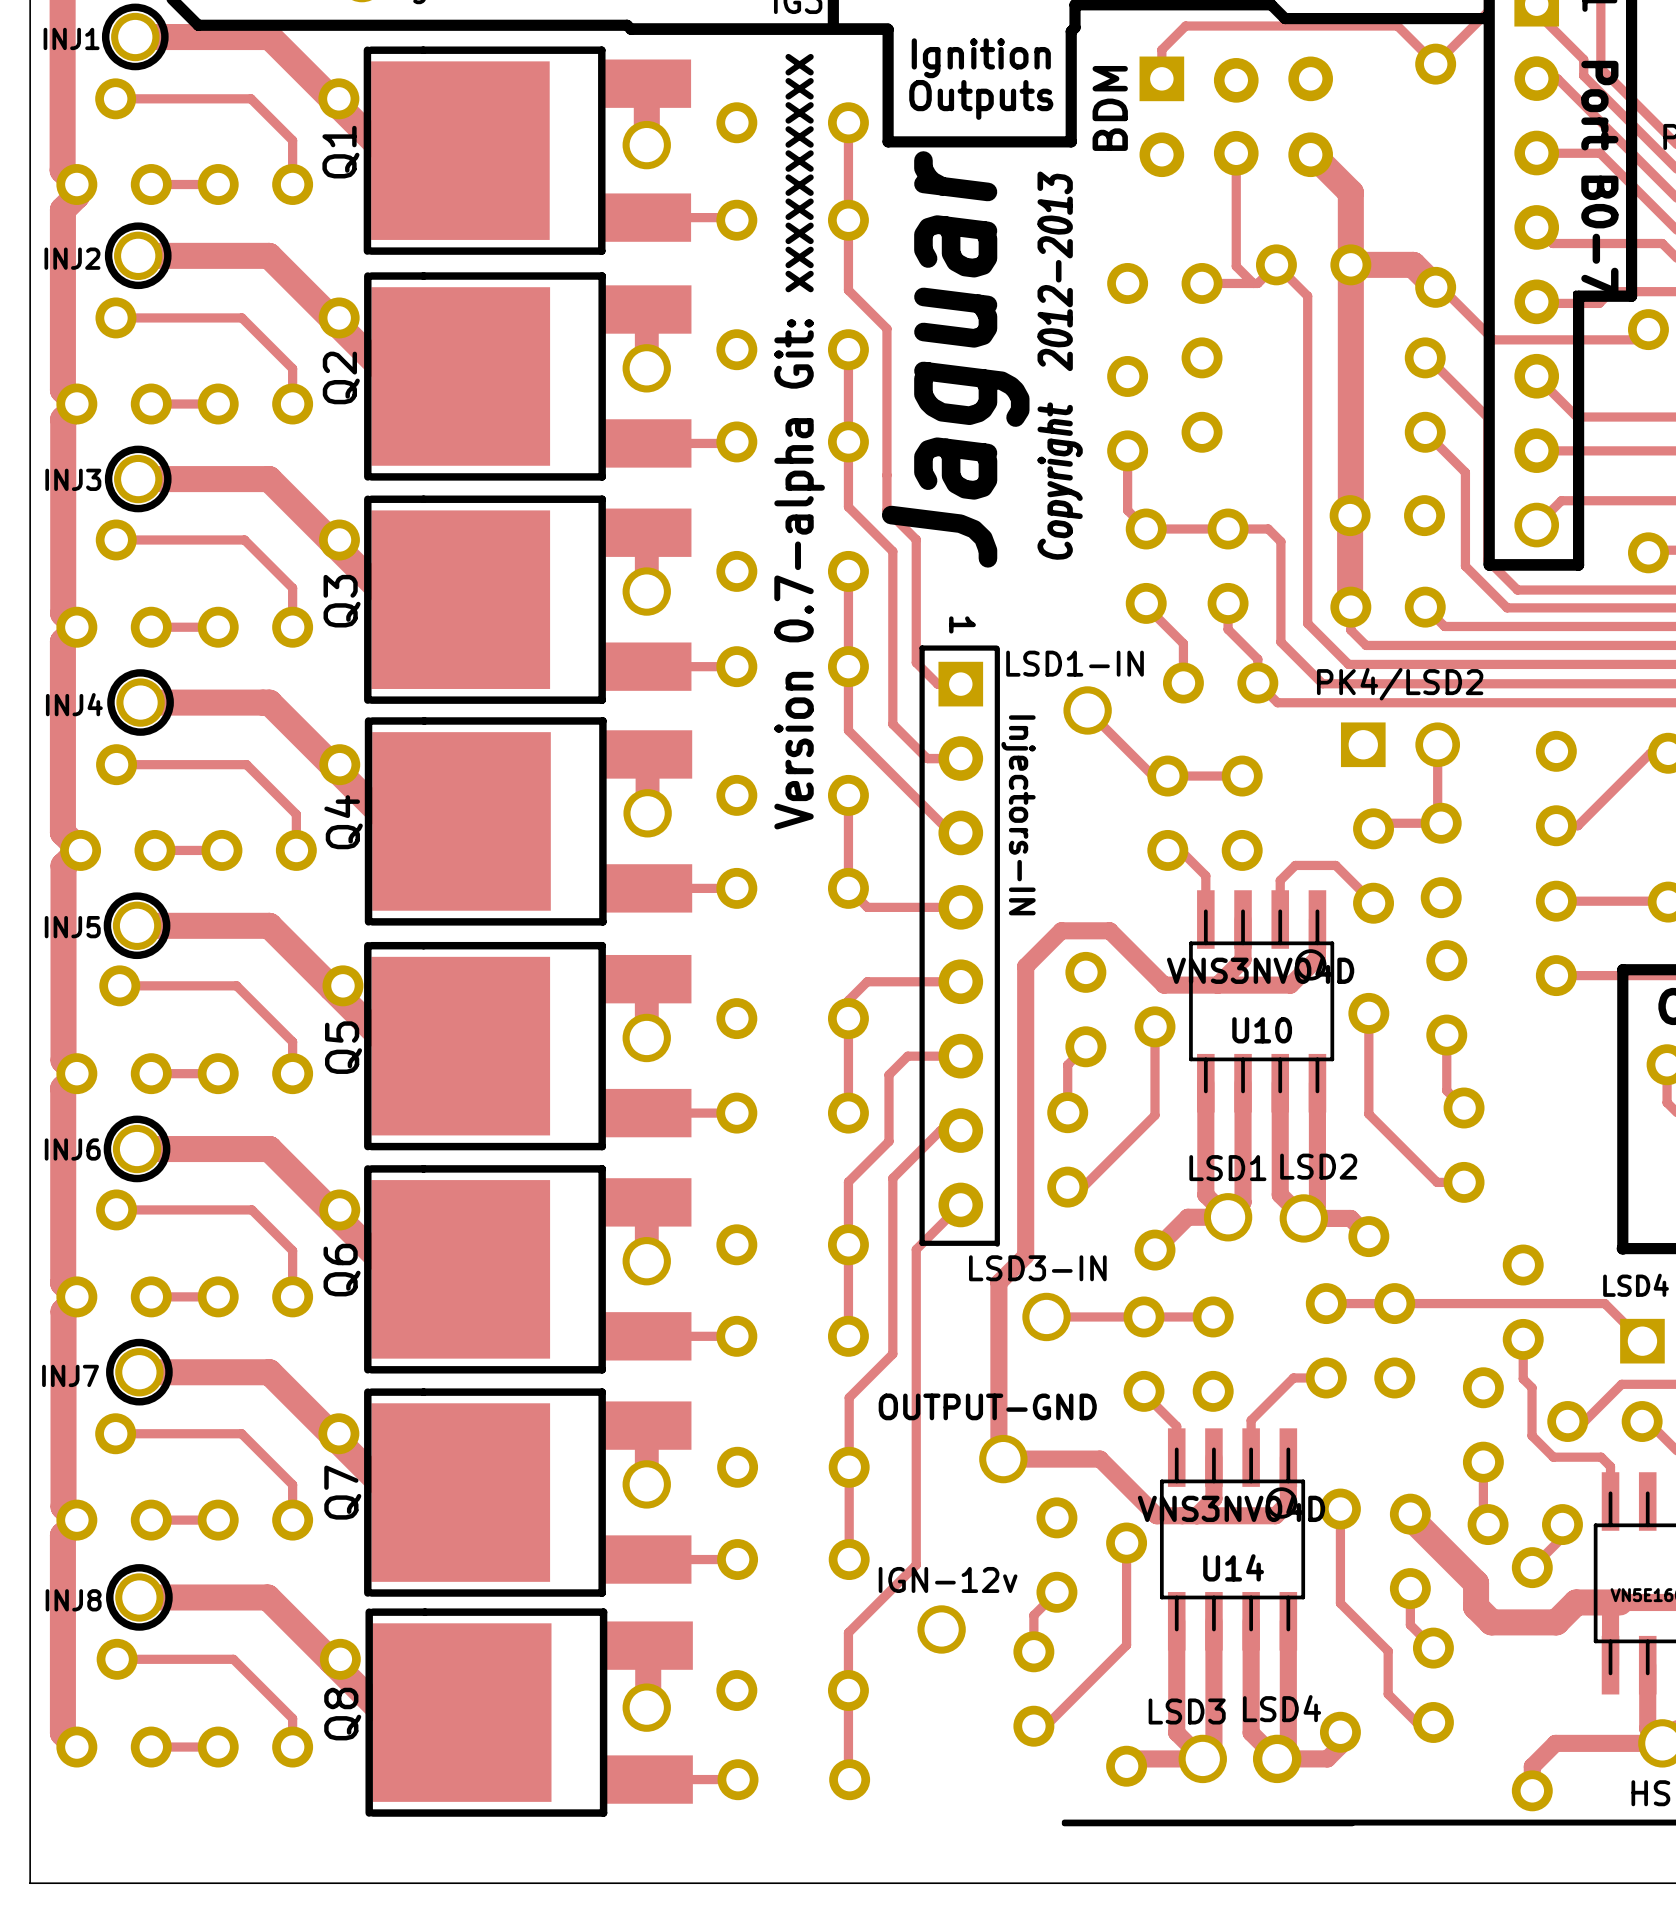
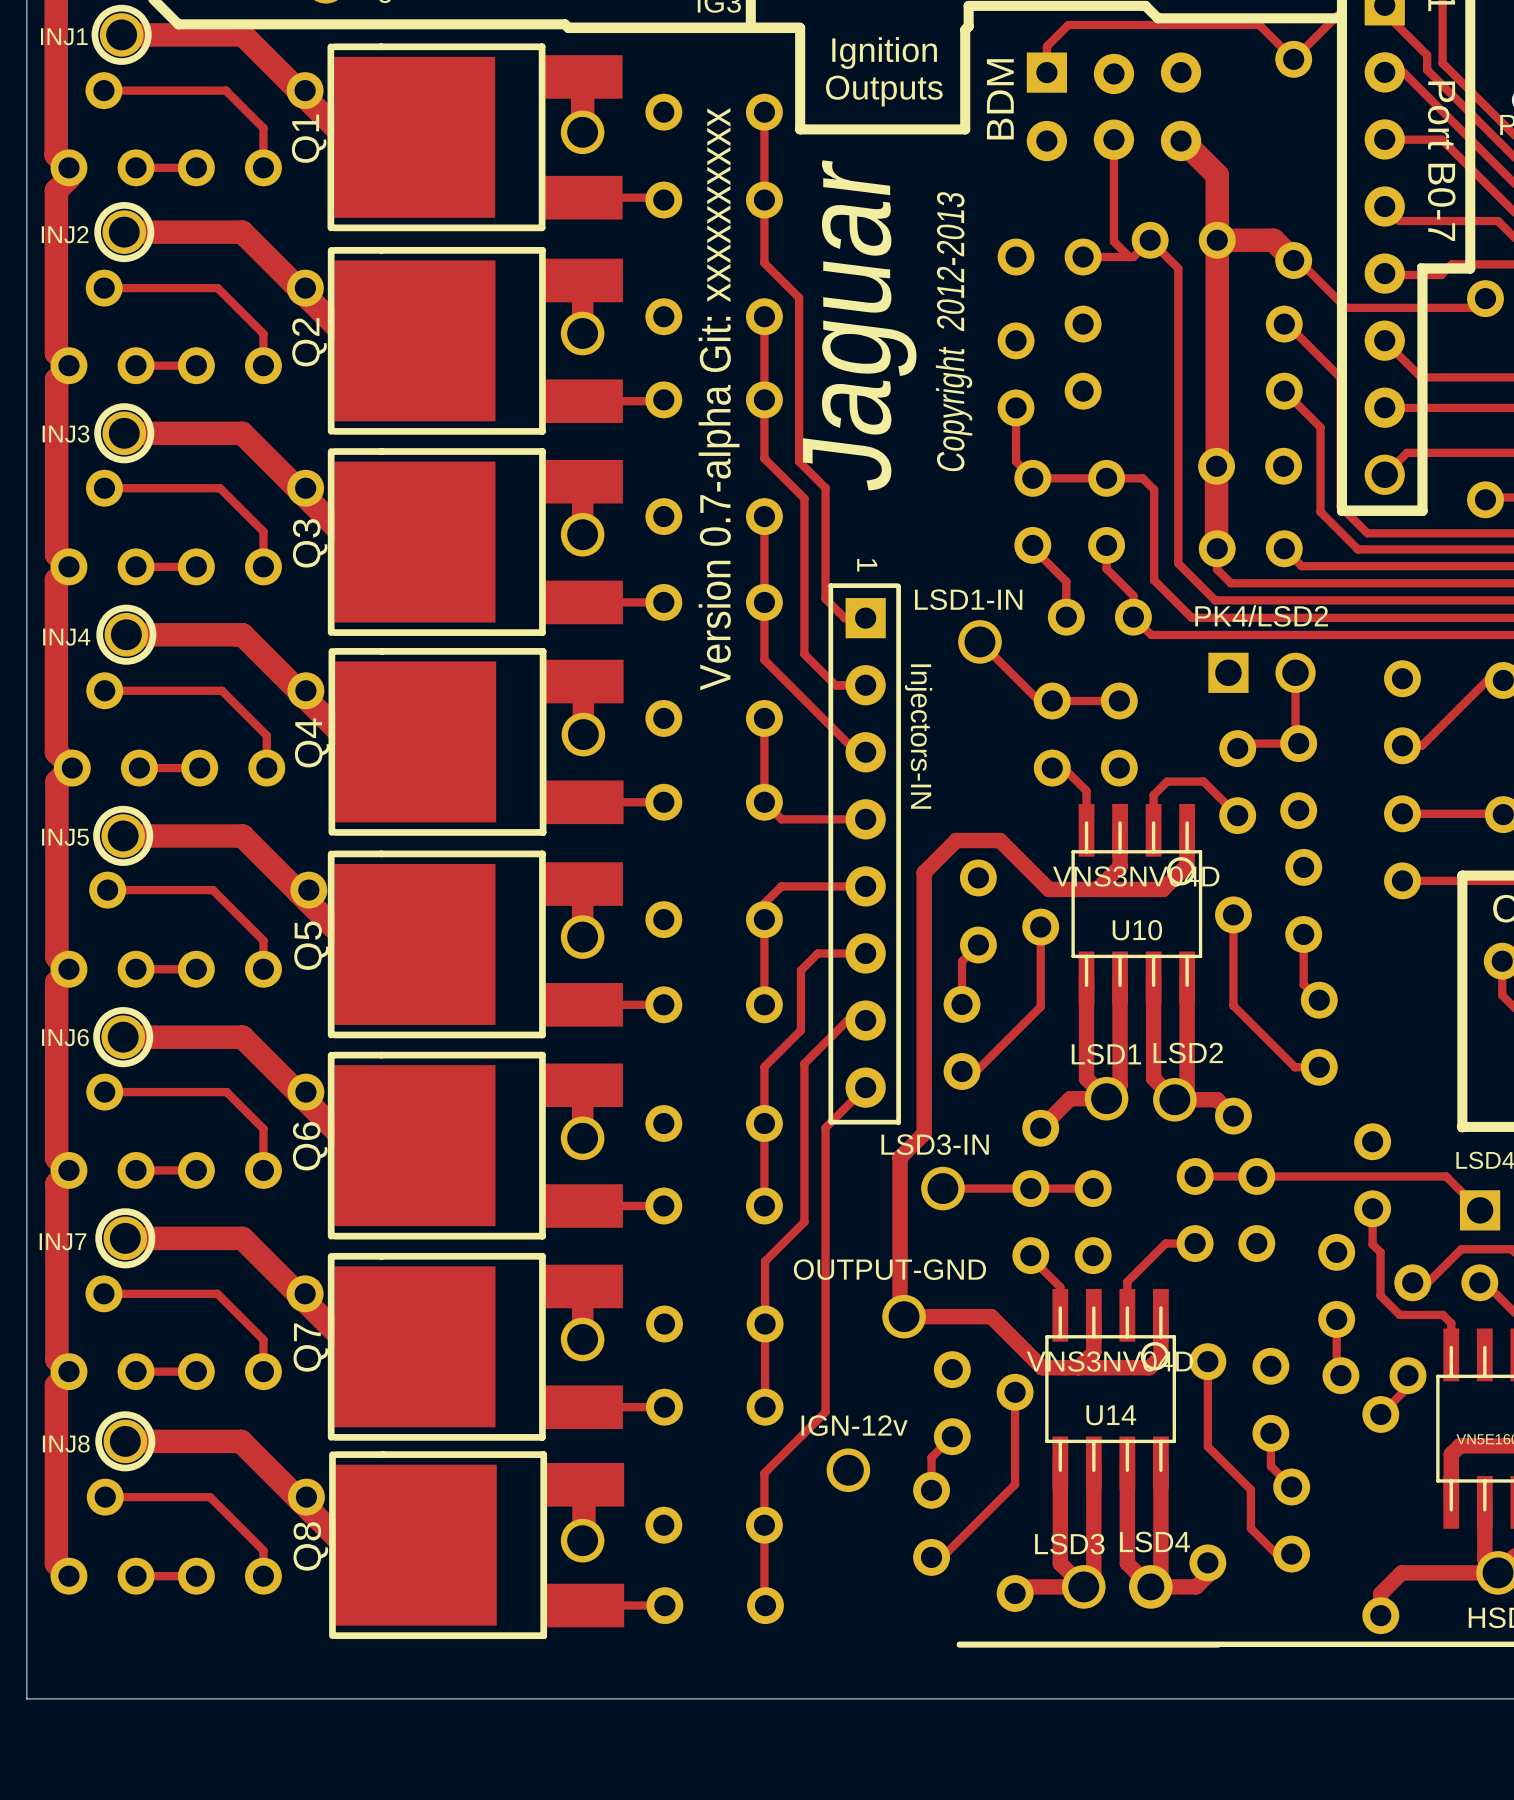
track: (1410, 1514) (1410, 1517) (1476, 1583) (1476, 1606) (1491, 1622) (1556, 1622) (1576, 1602) (1619, 1602) -> none

